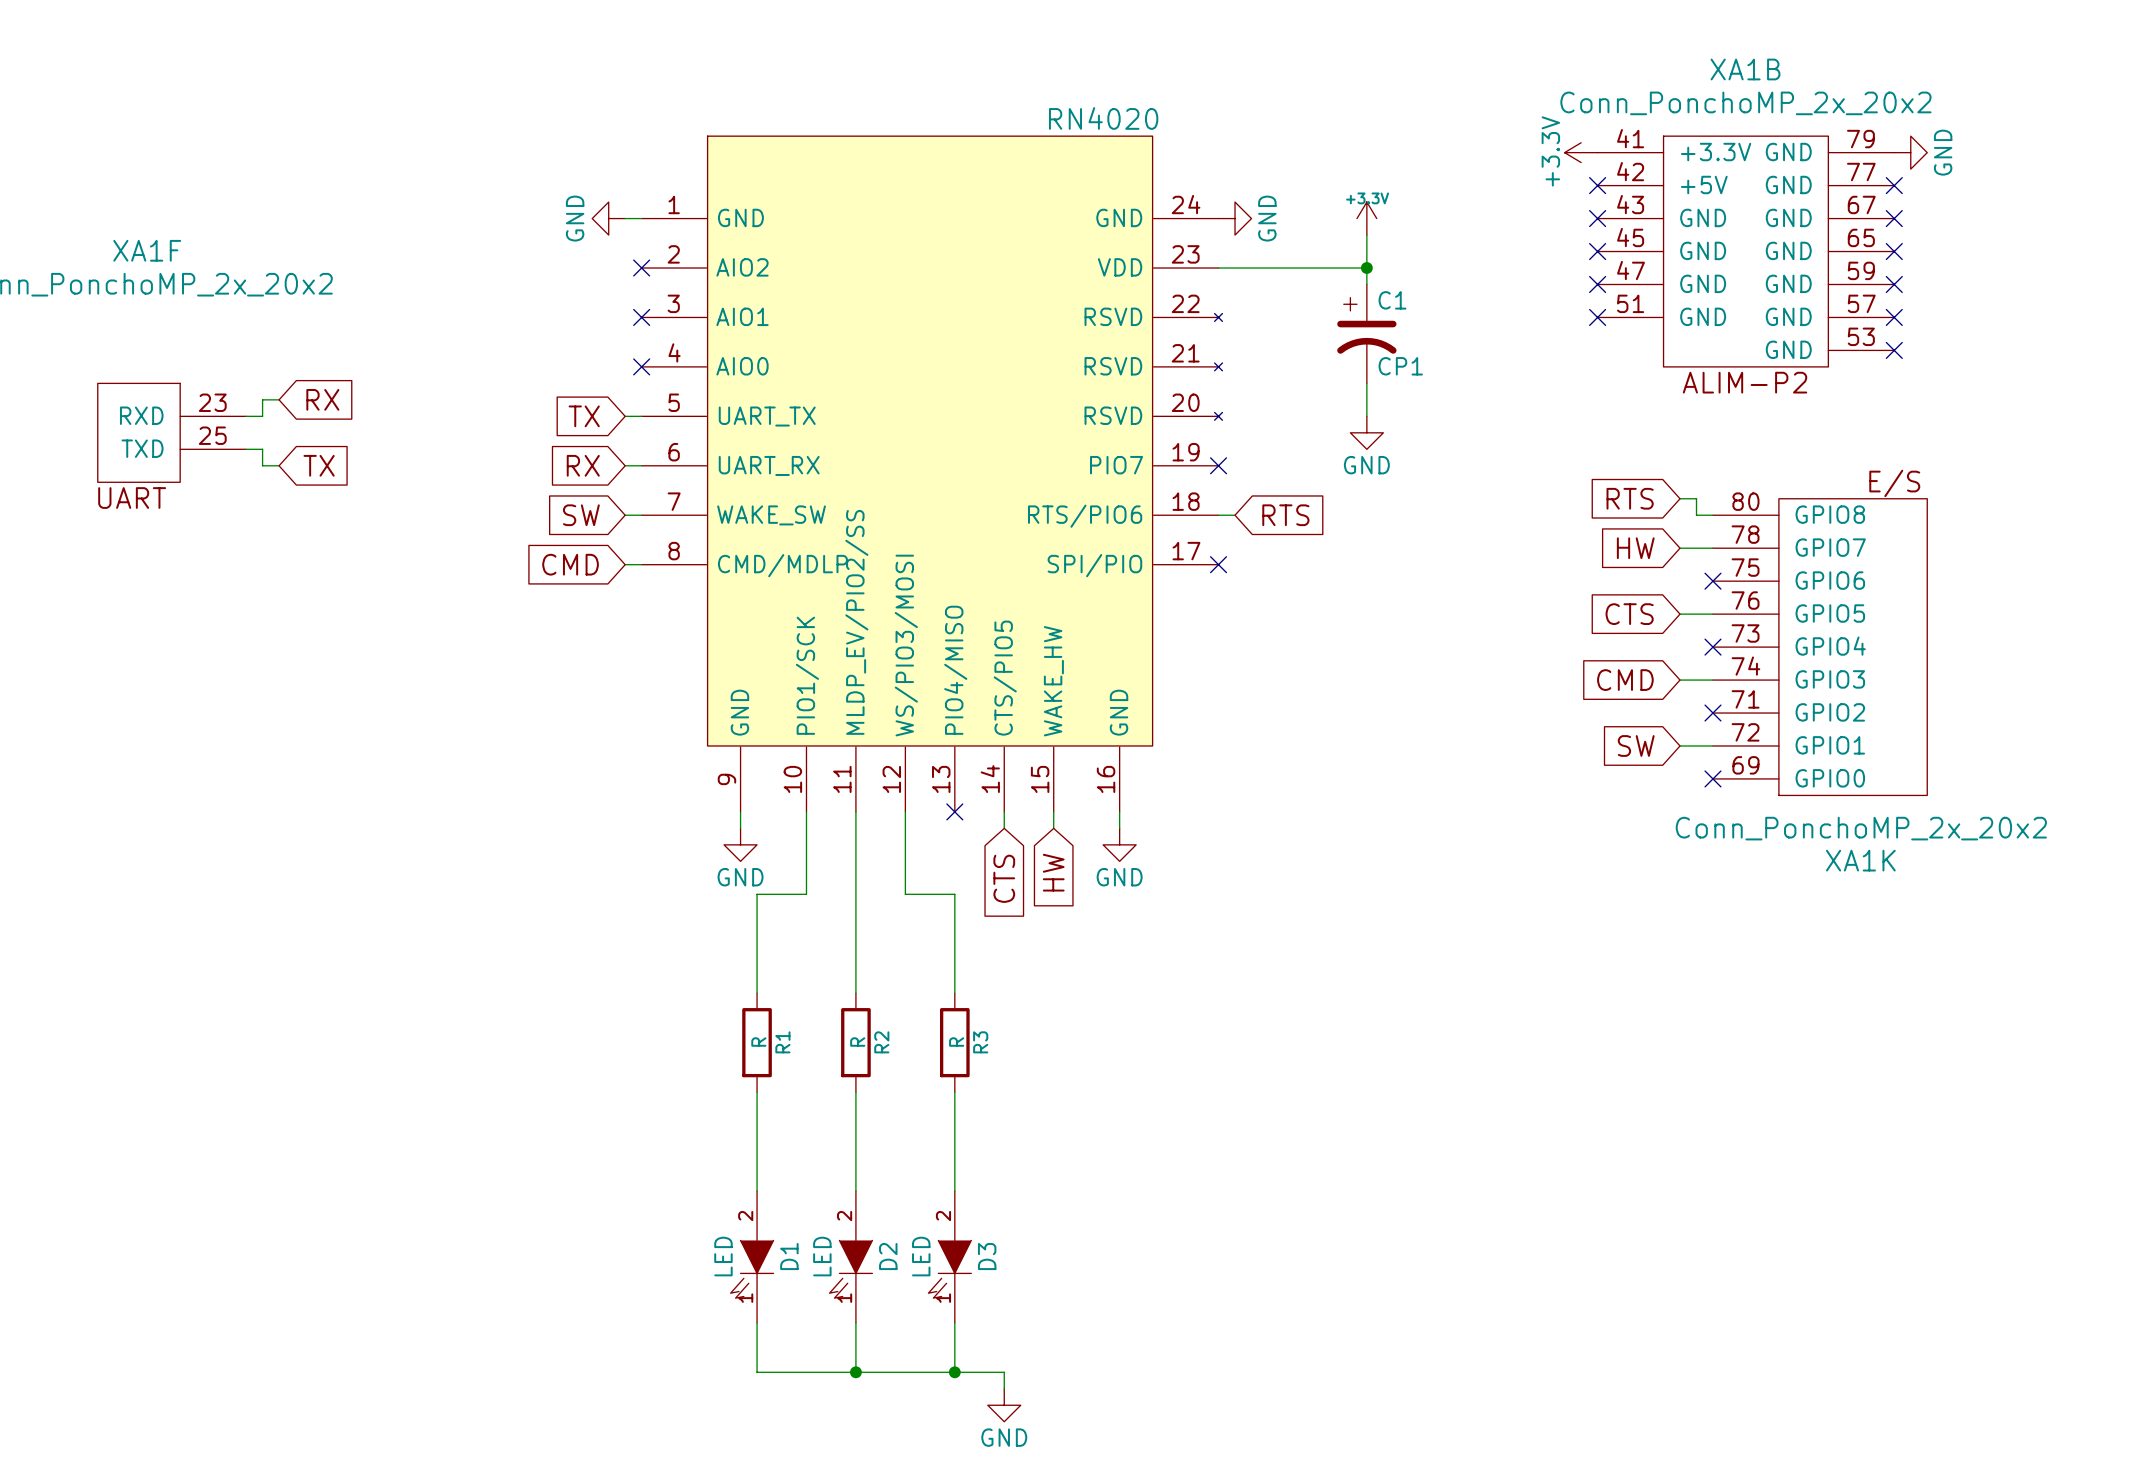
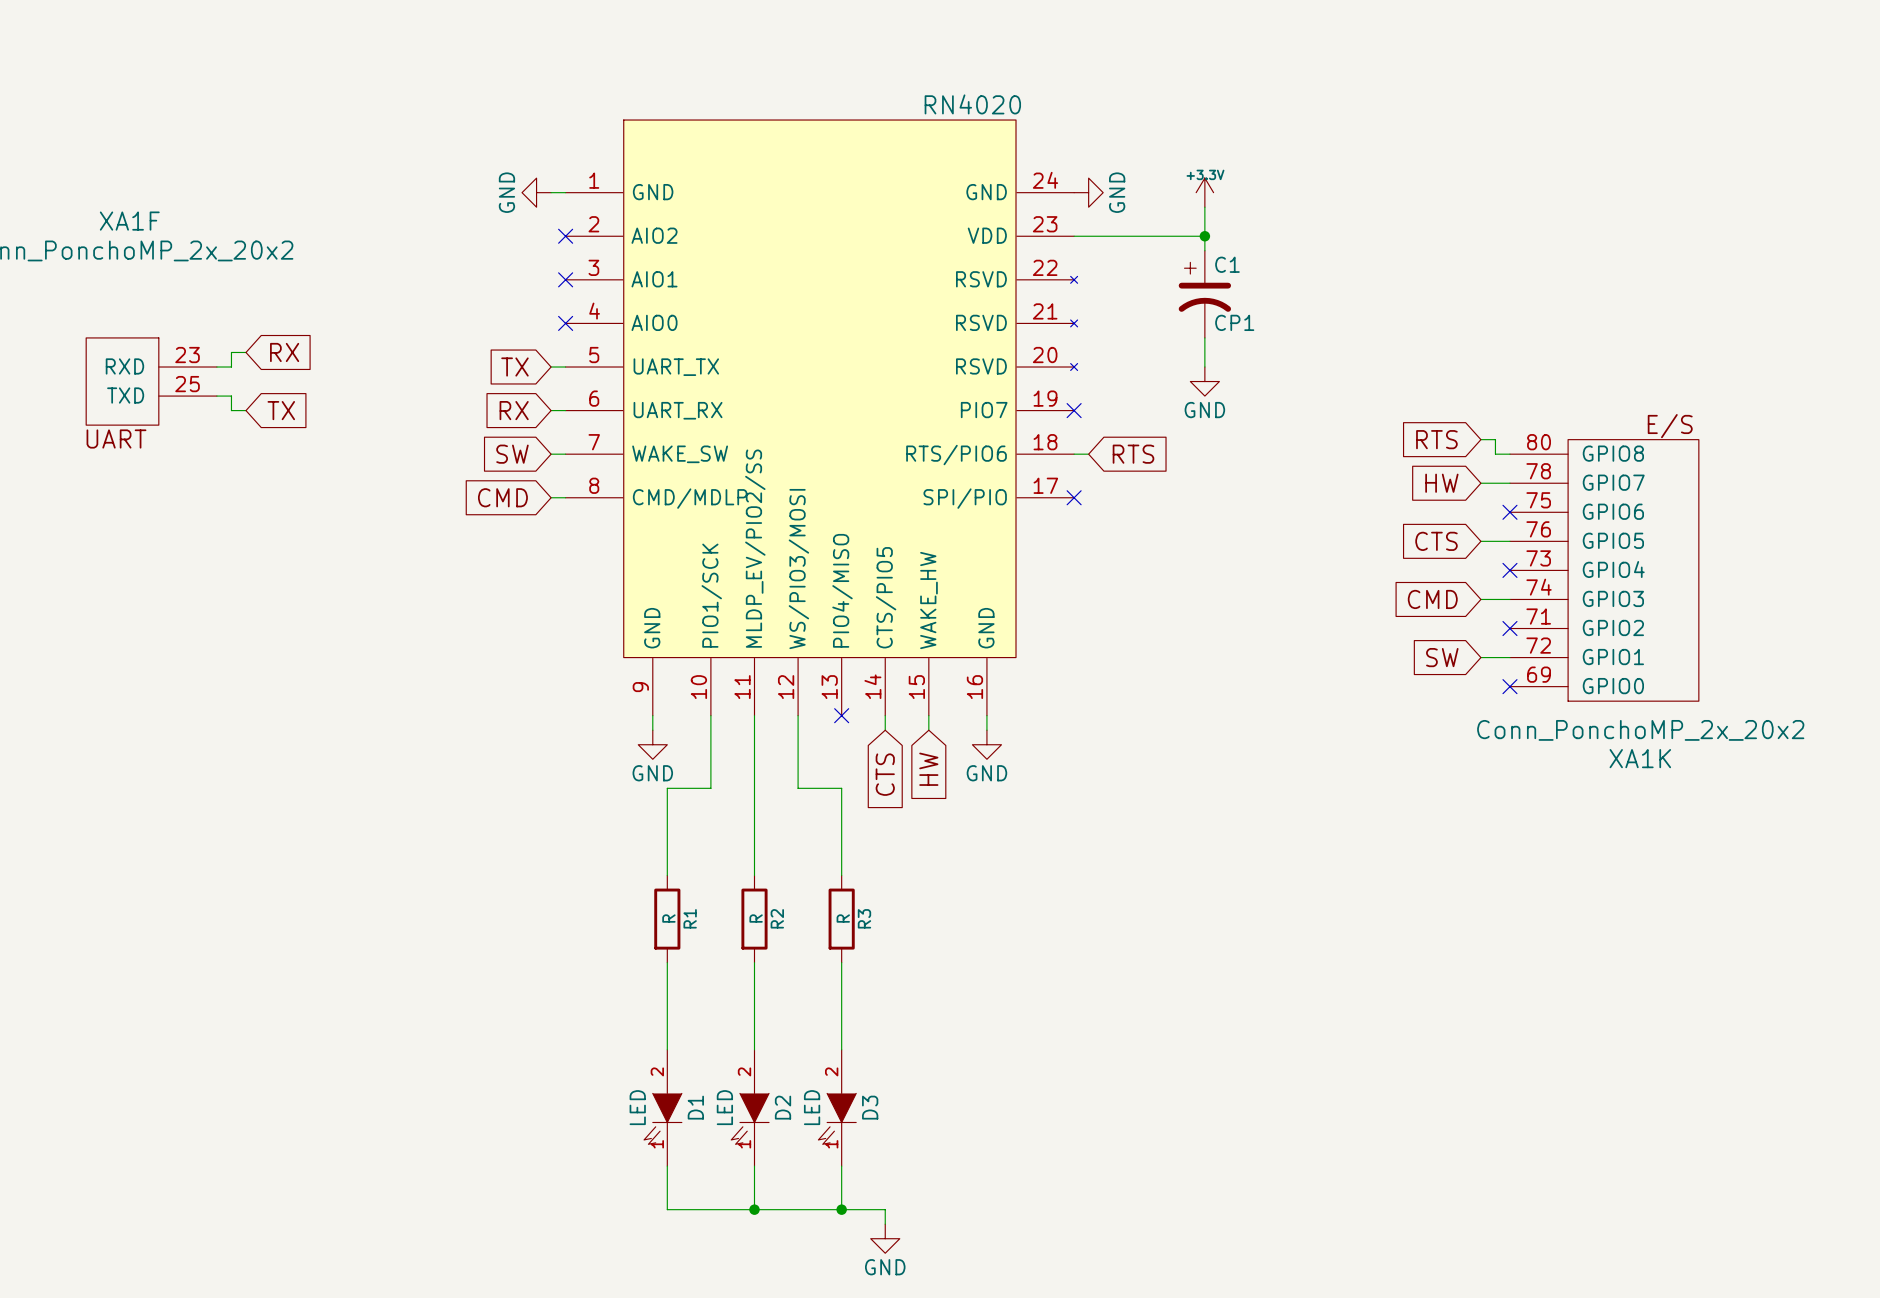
power symbol: +3.3V (1581, 152) -> none
power symbol: GND (1910, 152) -> none
no-connect mark: (1597, 185) -> none
no-connect mark: (1894, 185) -> none
no-connect mark: (1597, 218) -> none
no-connect mark: (1894, 218) -> none
no-connect mark: (1597, 251) -> none
XA1B: Conn_PonchoMP_2x_20x2 (1745, 251) -> none
no-connect mark: (1894, 251) -> none
no-connect mark: (1597, 284) -> none
no-connect mark: (1894, 284) -> none
no-connect mark: (1597, 317) -> none
no-connect mark: (1894, 317) -> none
no-connect mark: (1894, 350) -> none

